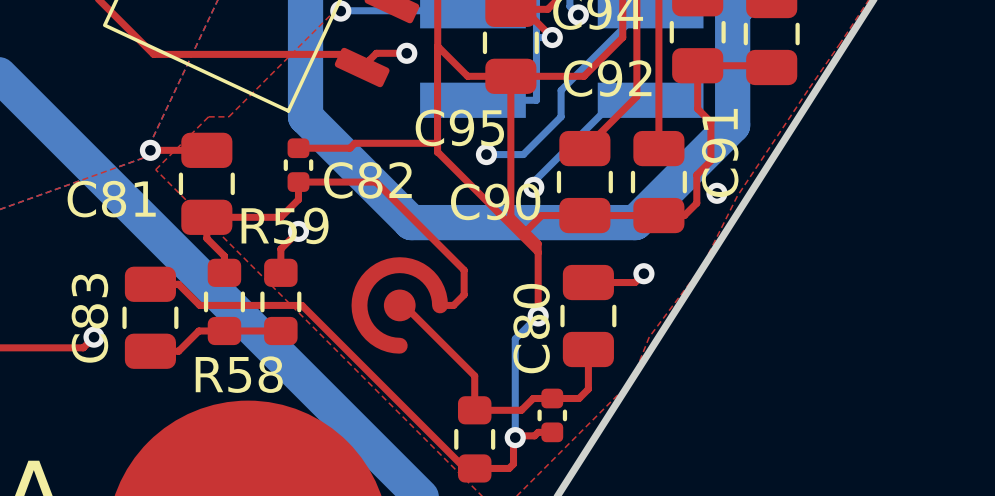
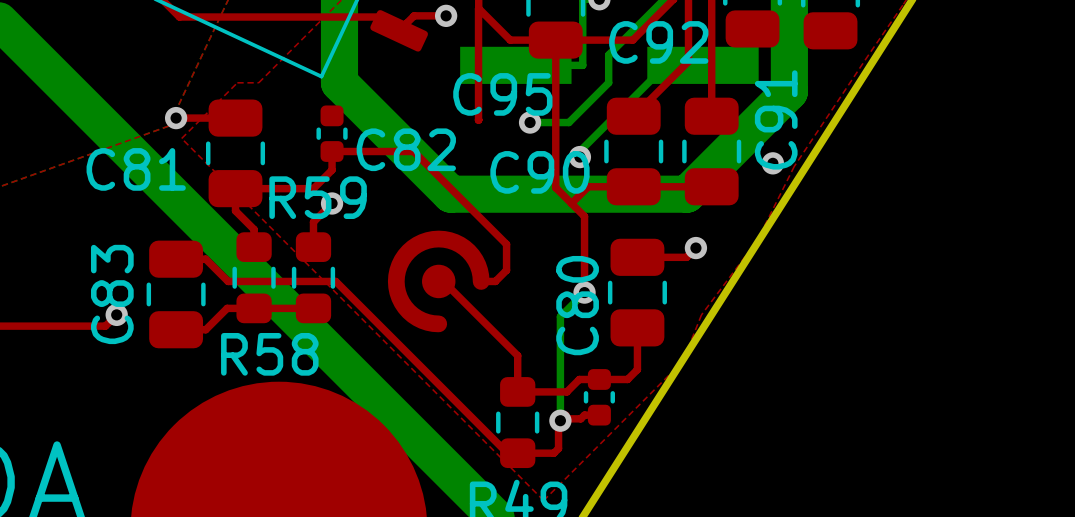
top track: (771, 67) (769, 65) (697, 65) (697, 108) (710, 122) (710, 160) (696, 175) (696, 203) (684, 215) (658, 215) -> none
top track: (437, 143) (354, 143) (349, 148) (298, 148) -> none
top track: (437, 152) (538, 252) -> none

